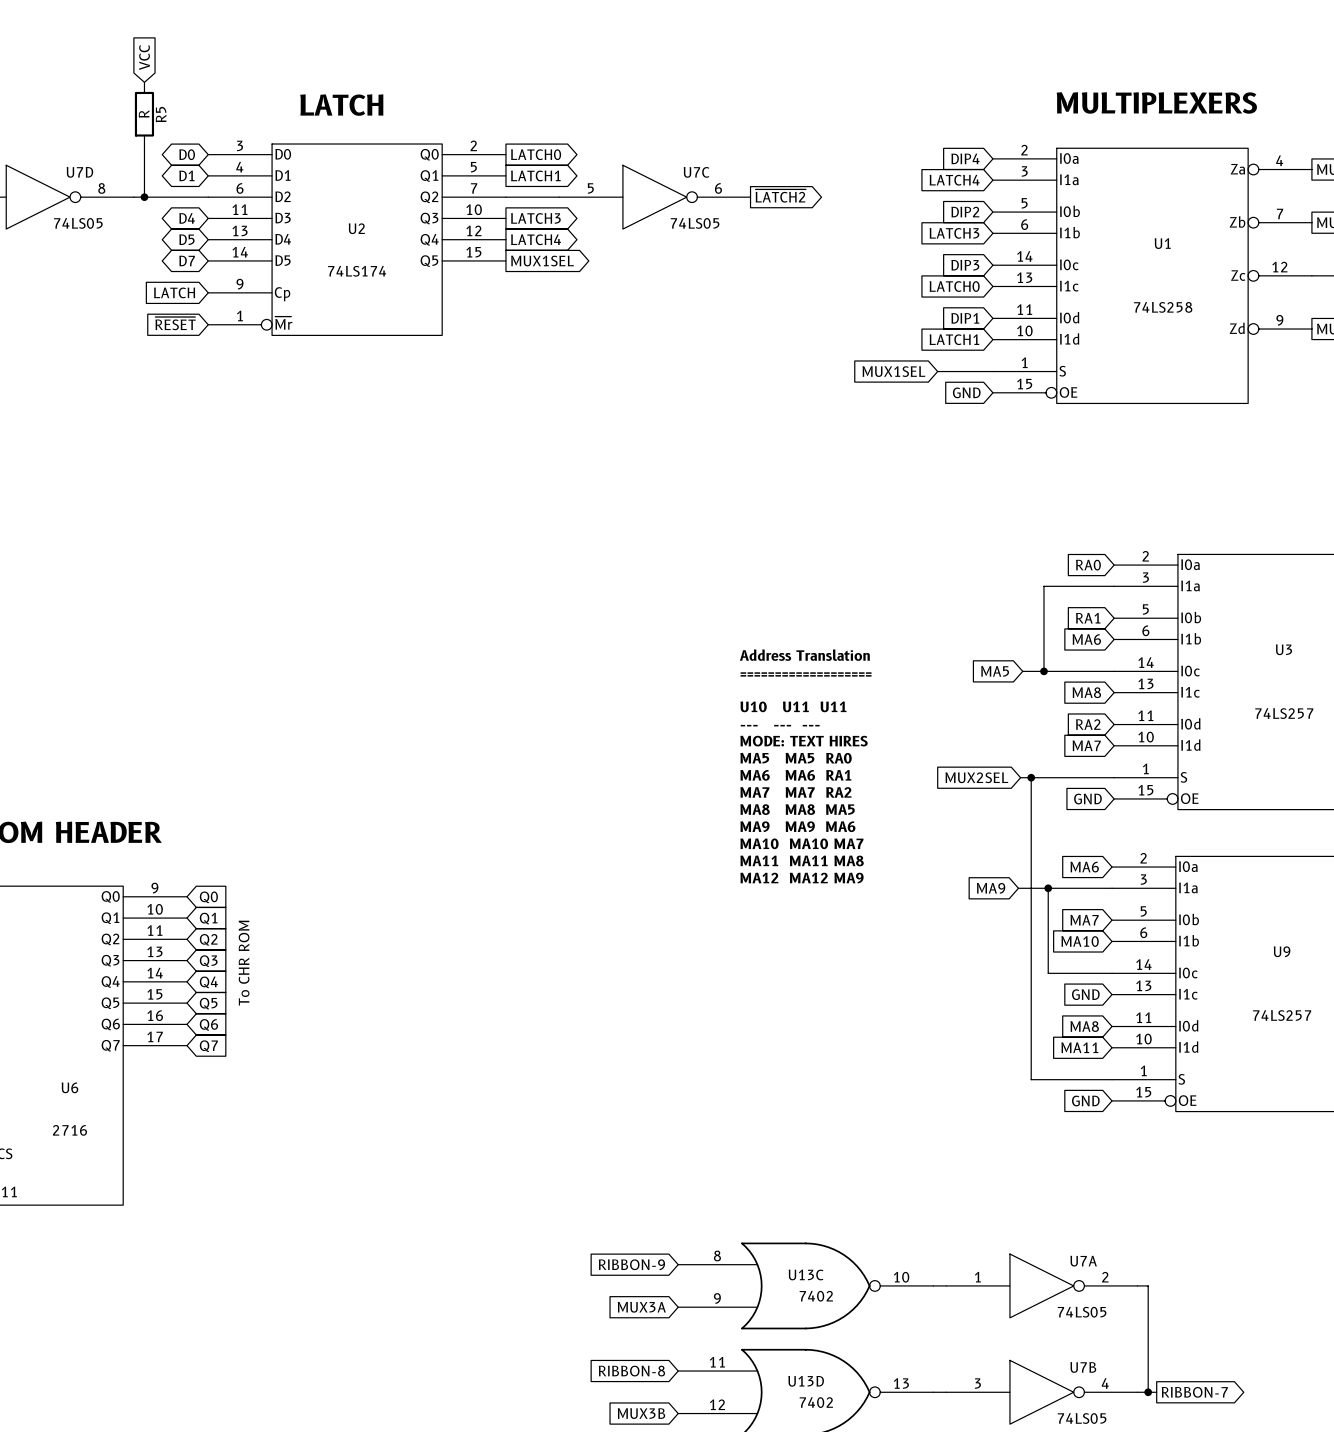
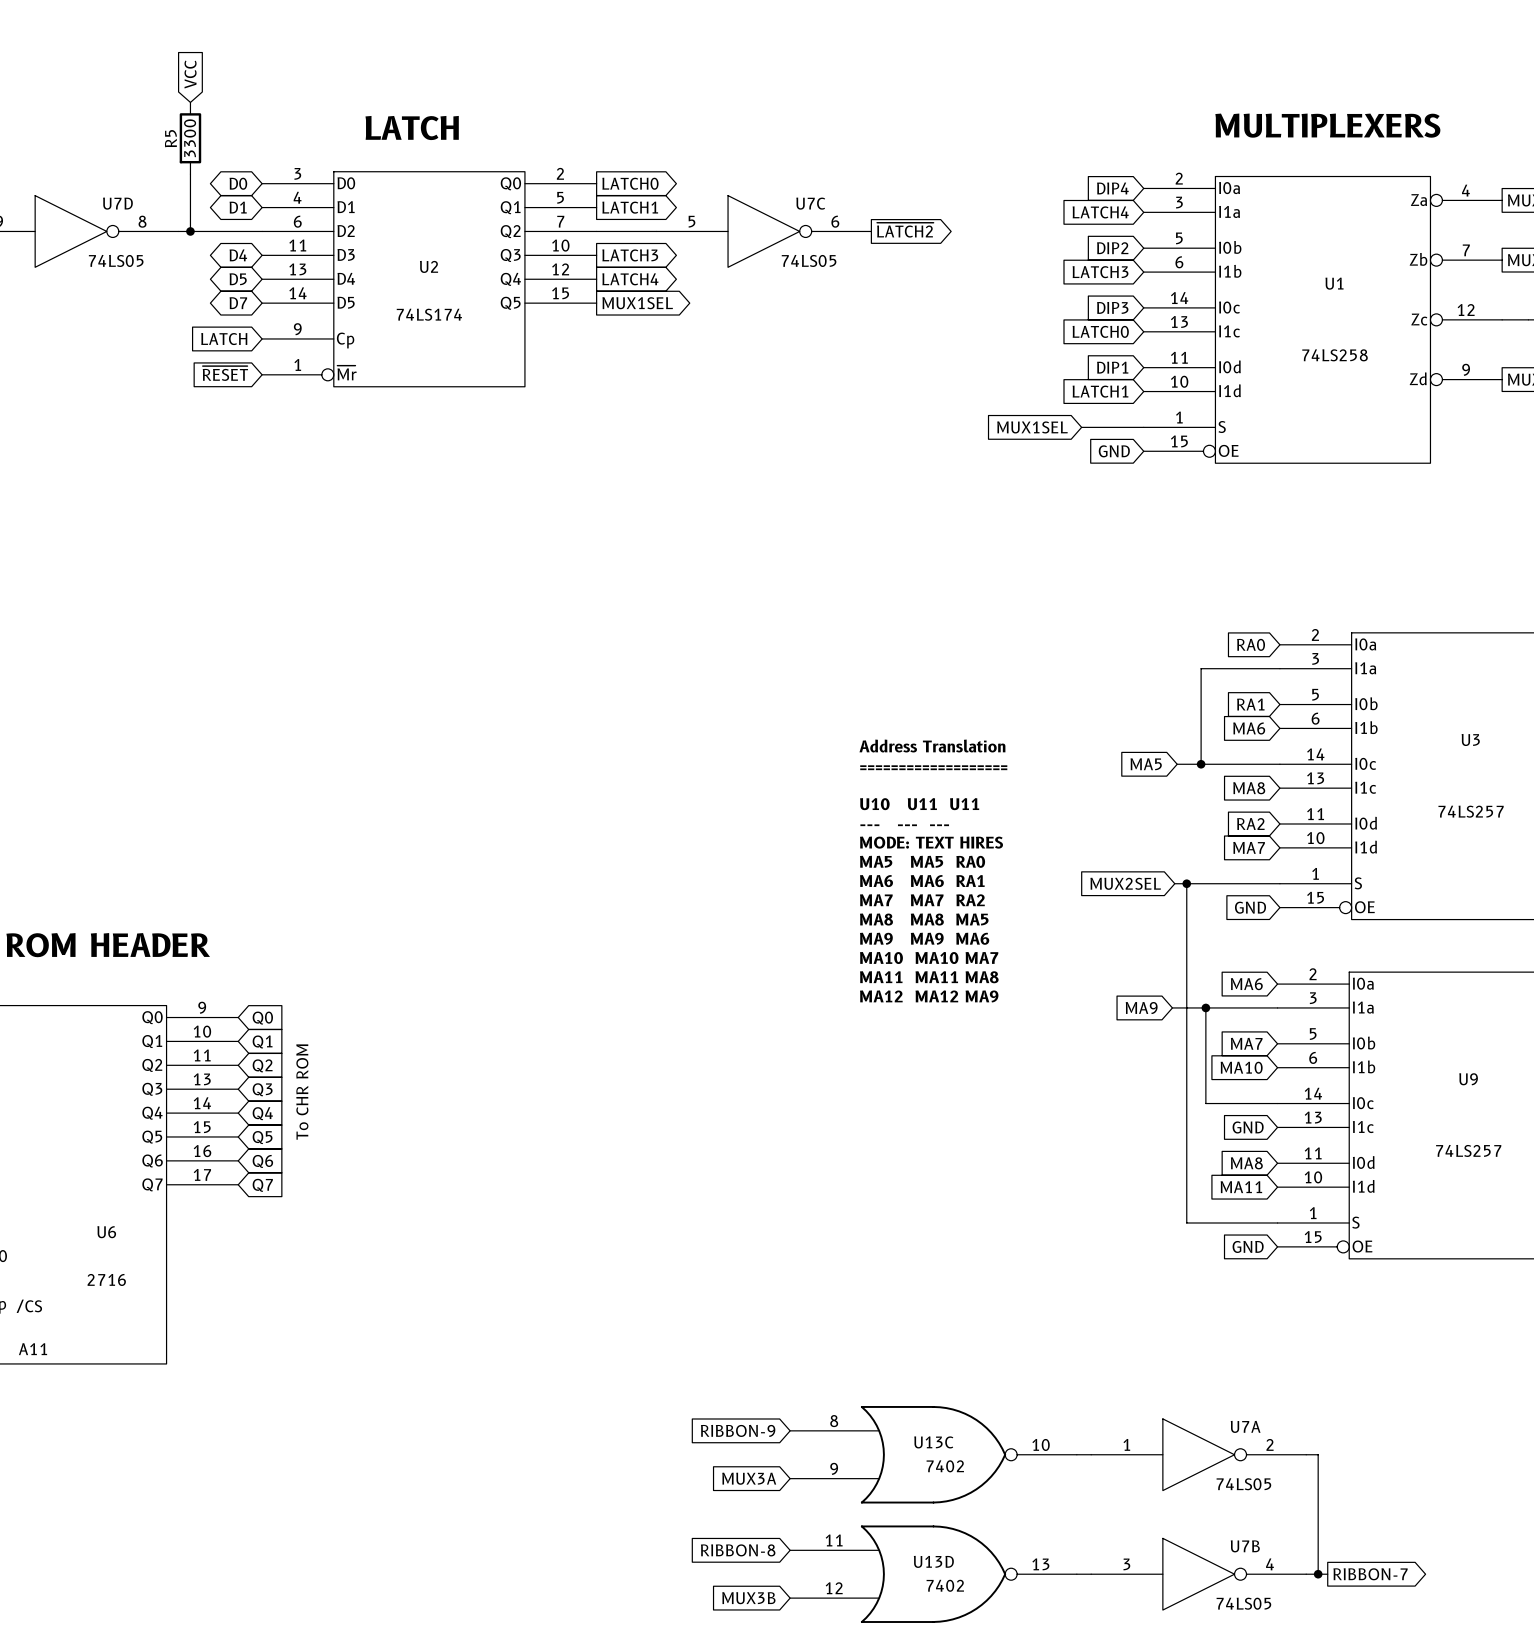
R5 value: R (144, 113) -> 3300 (190, 138)
R5 name position: R5 (161, 114) -> R5 (170, 138)

